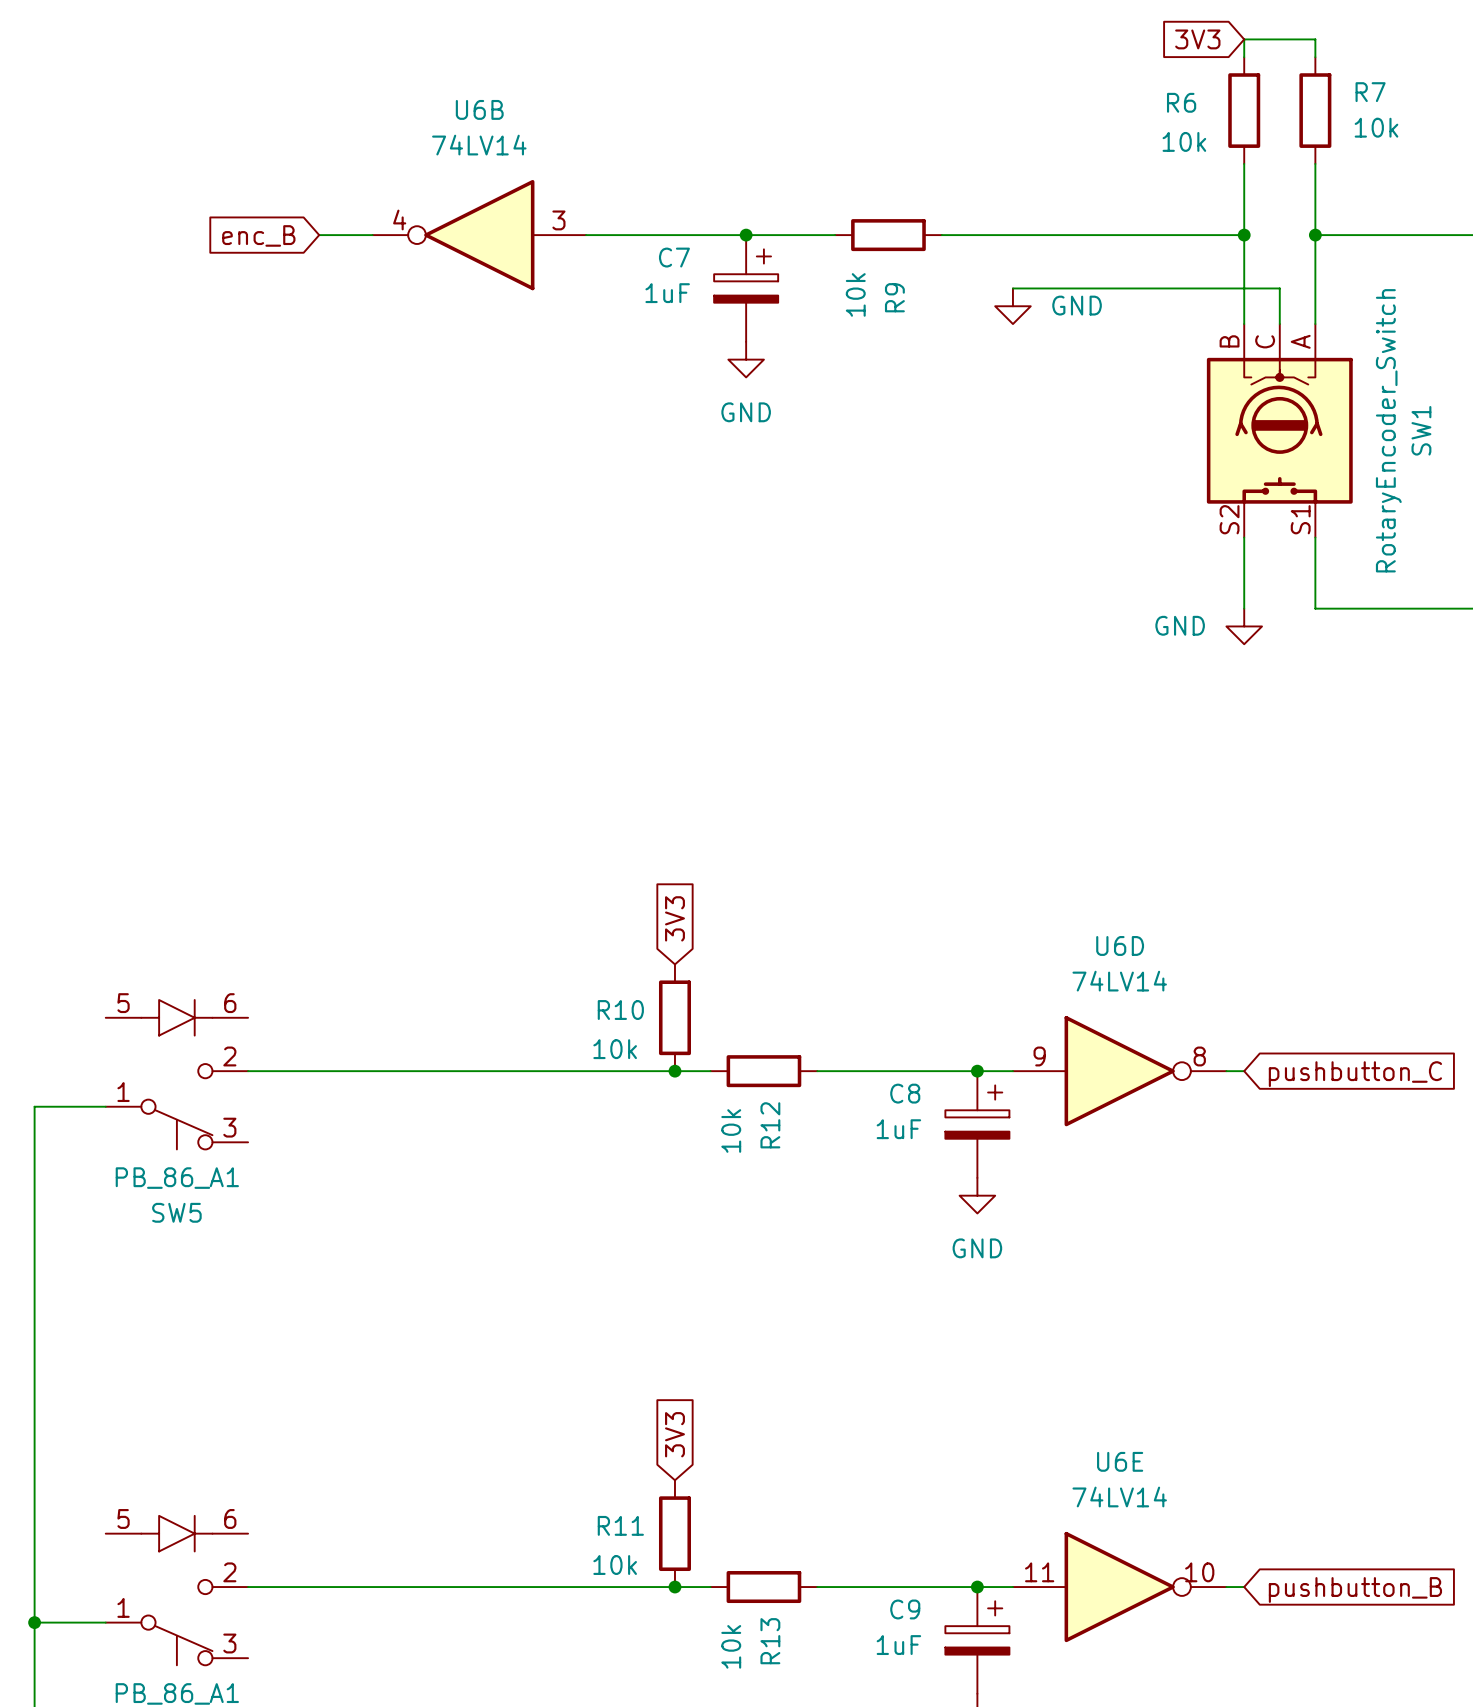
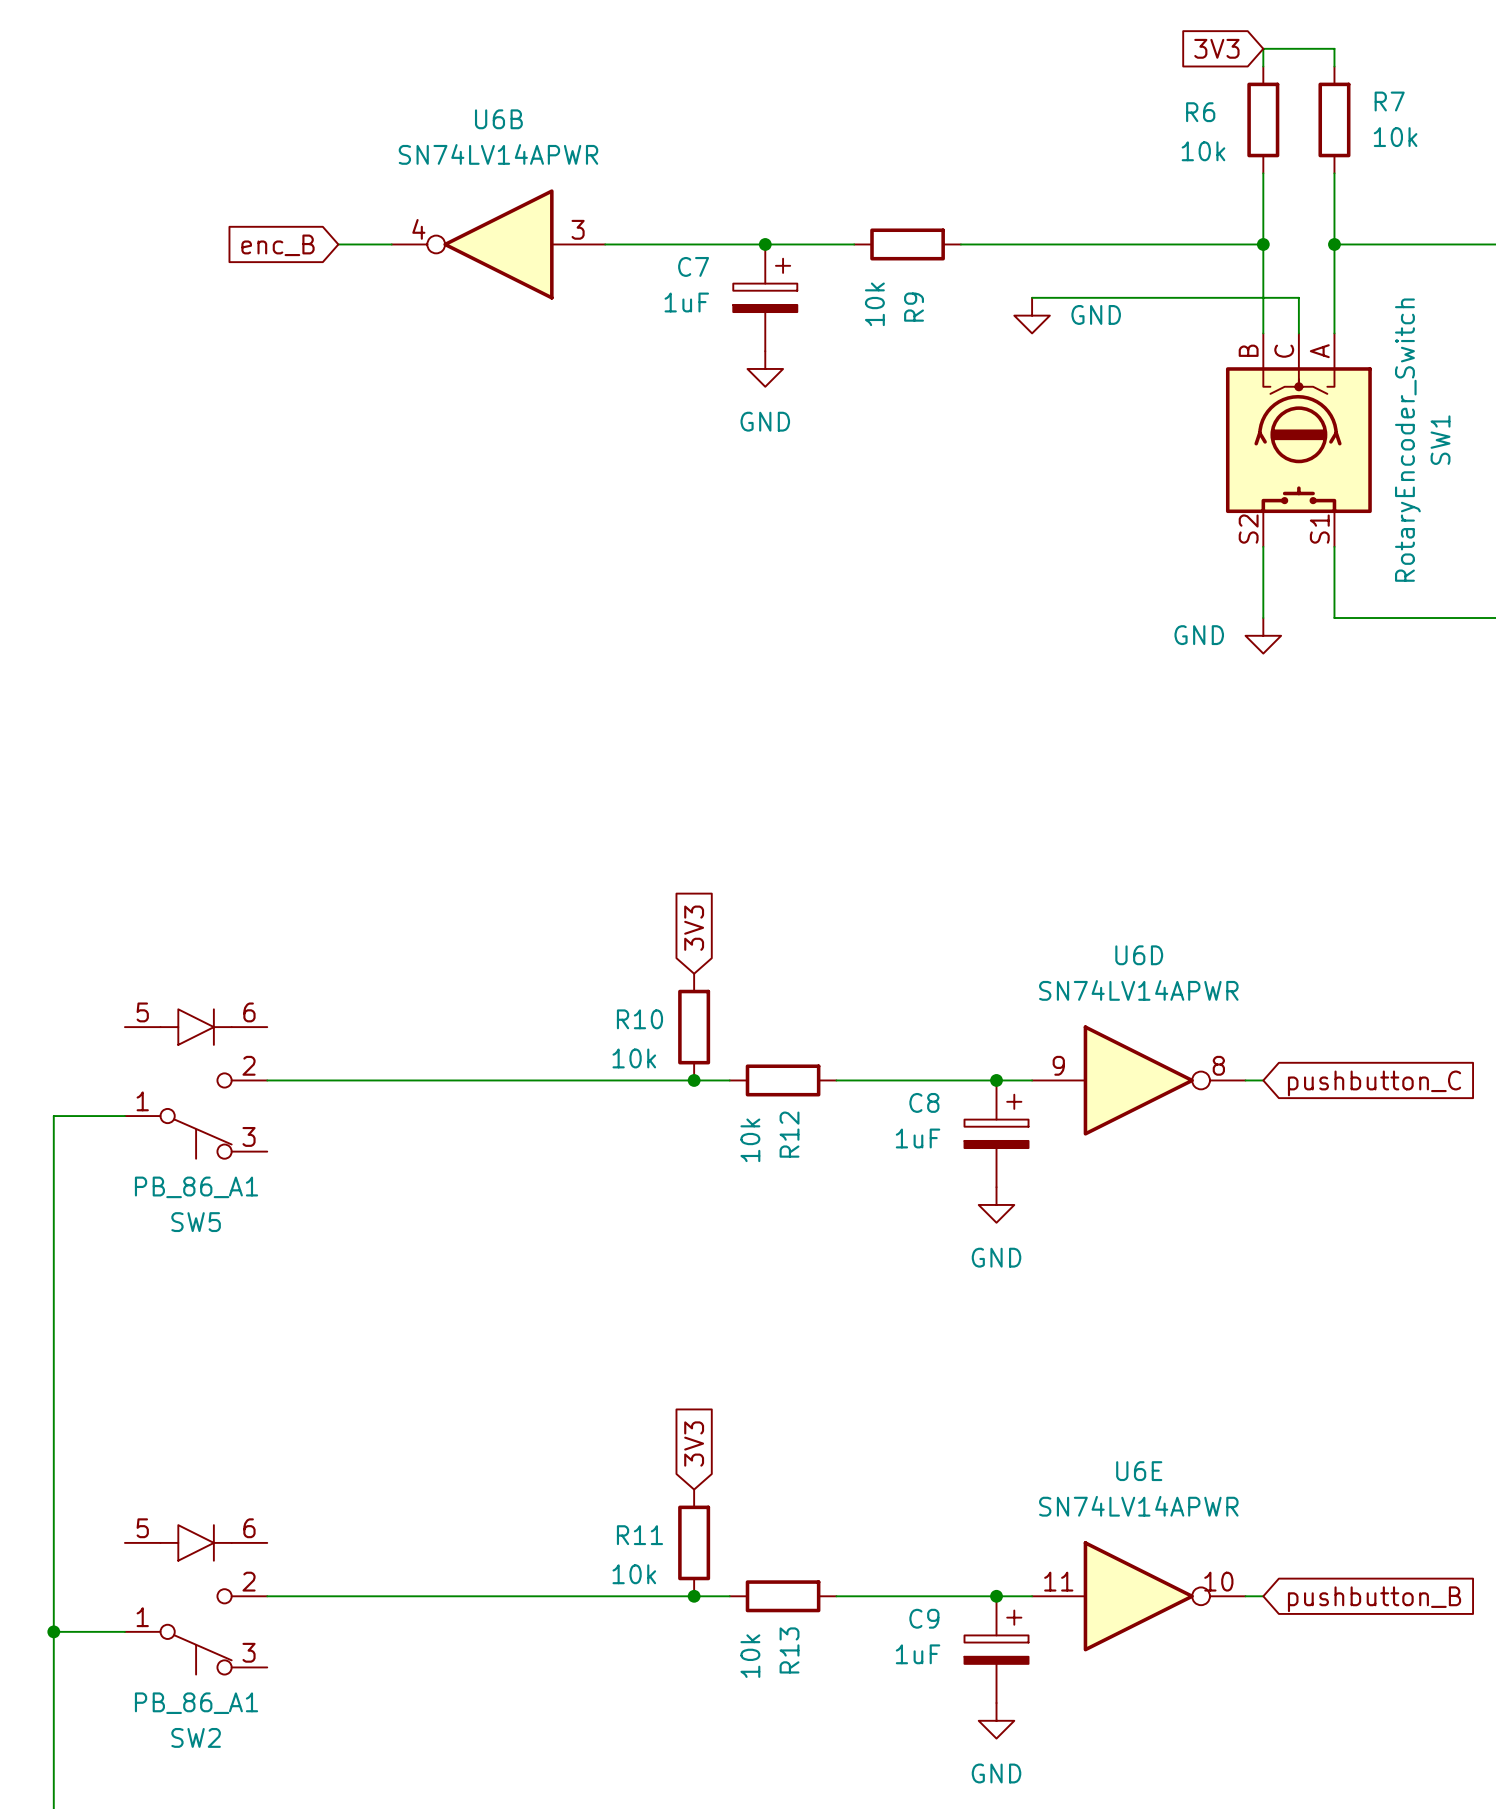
U6B value: 74LV14 (479, 145) -> SN74LV14APWR (498, 154)
U6D value: 74LV14 (1119, 981) -> SN74LV14APWR (1138, 990)
U6E value: 74LV14 (1119, 1496) -> SN74LV14APWR (1138, 1506)

